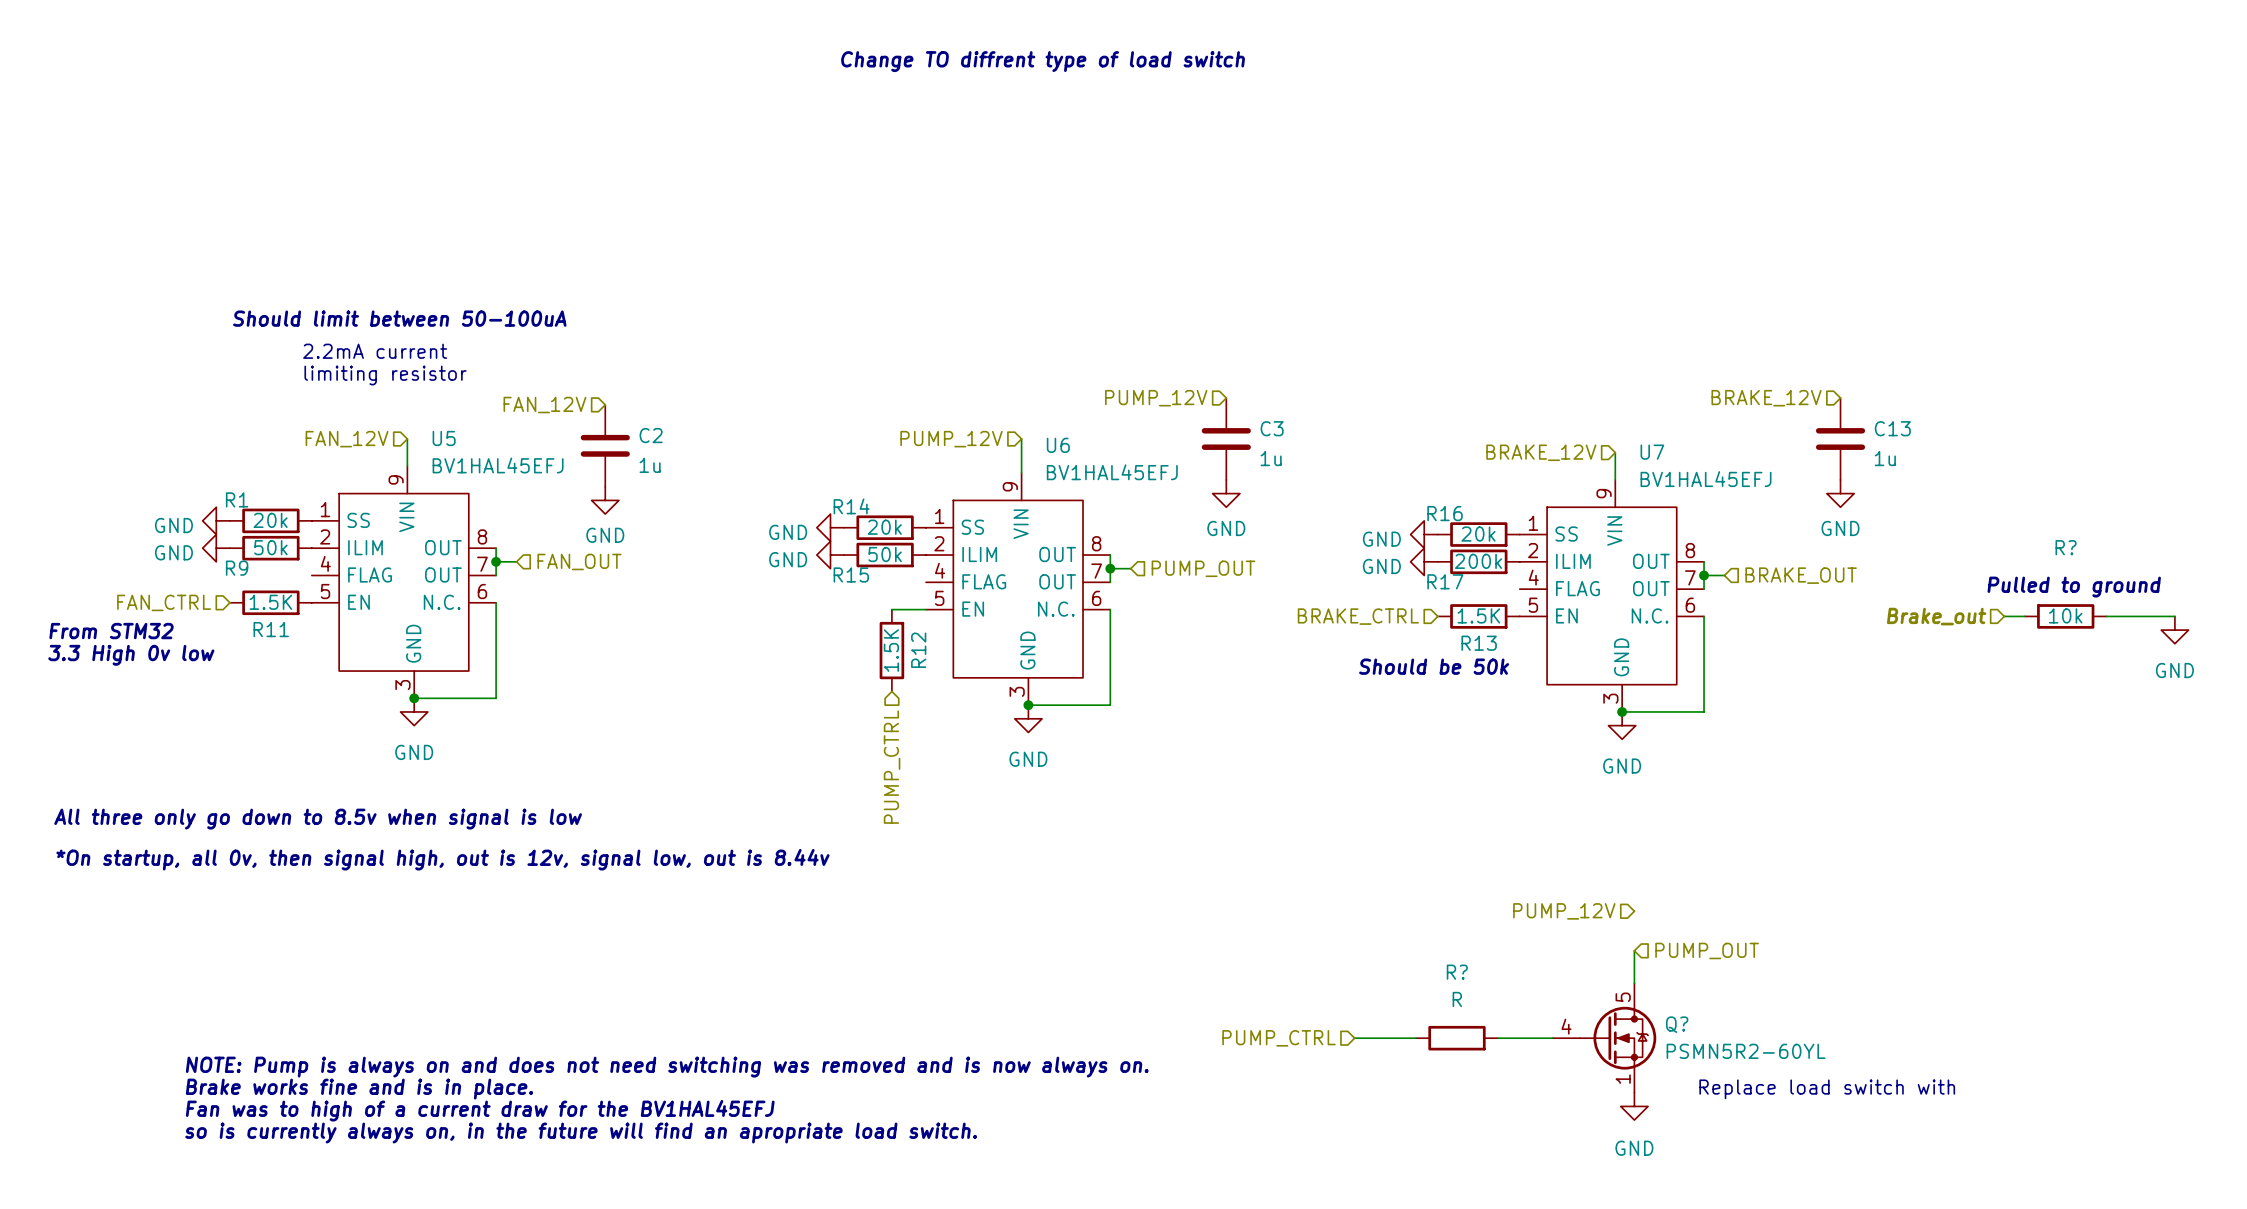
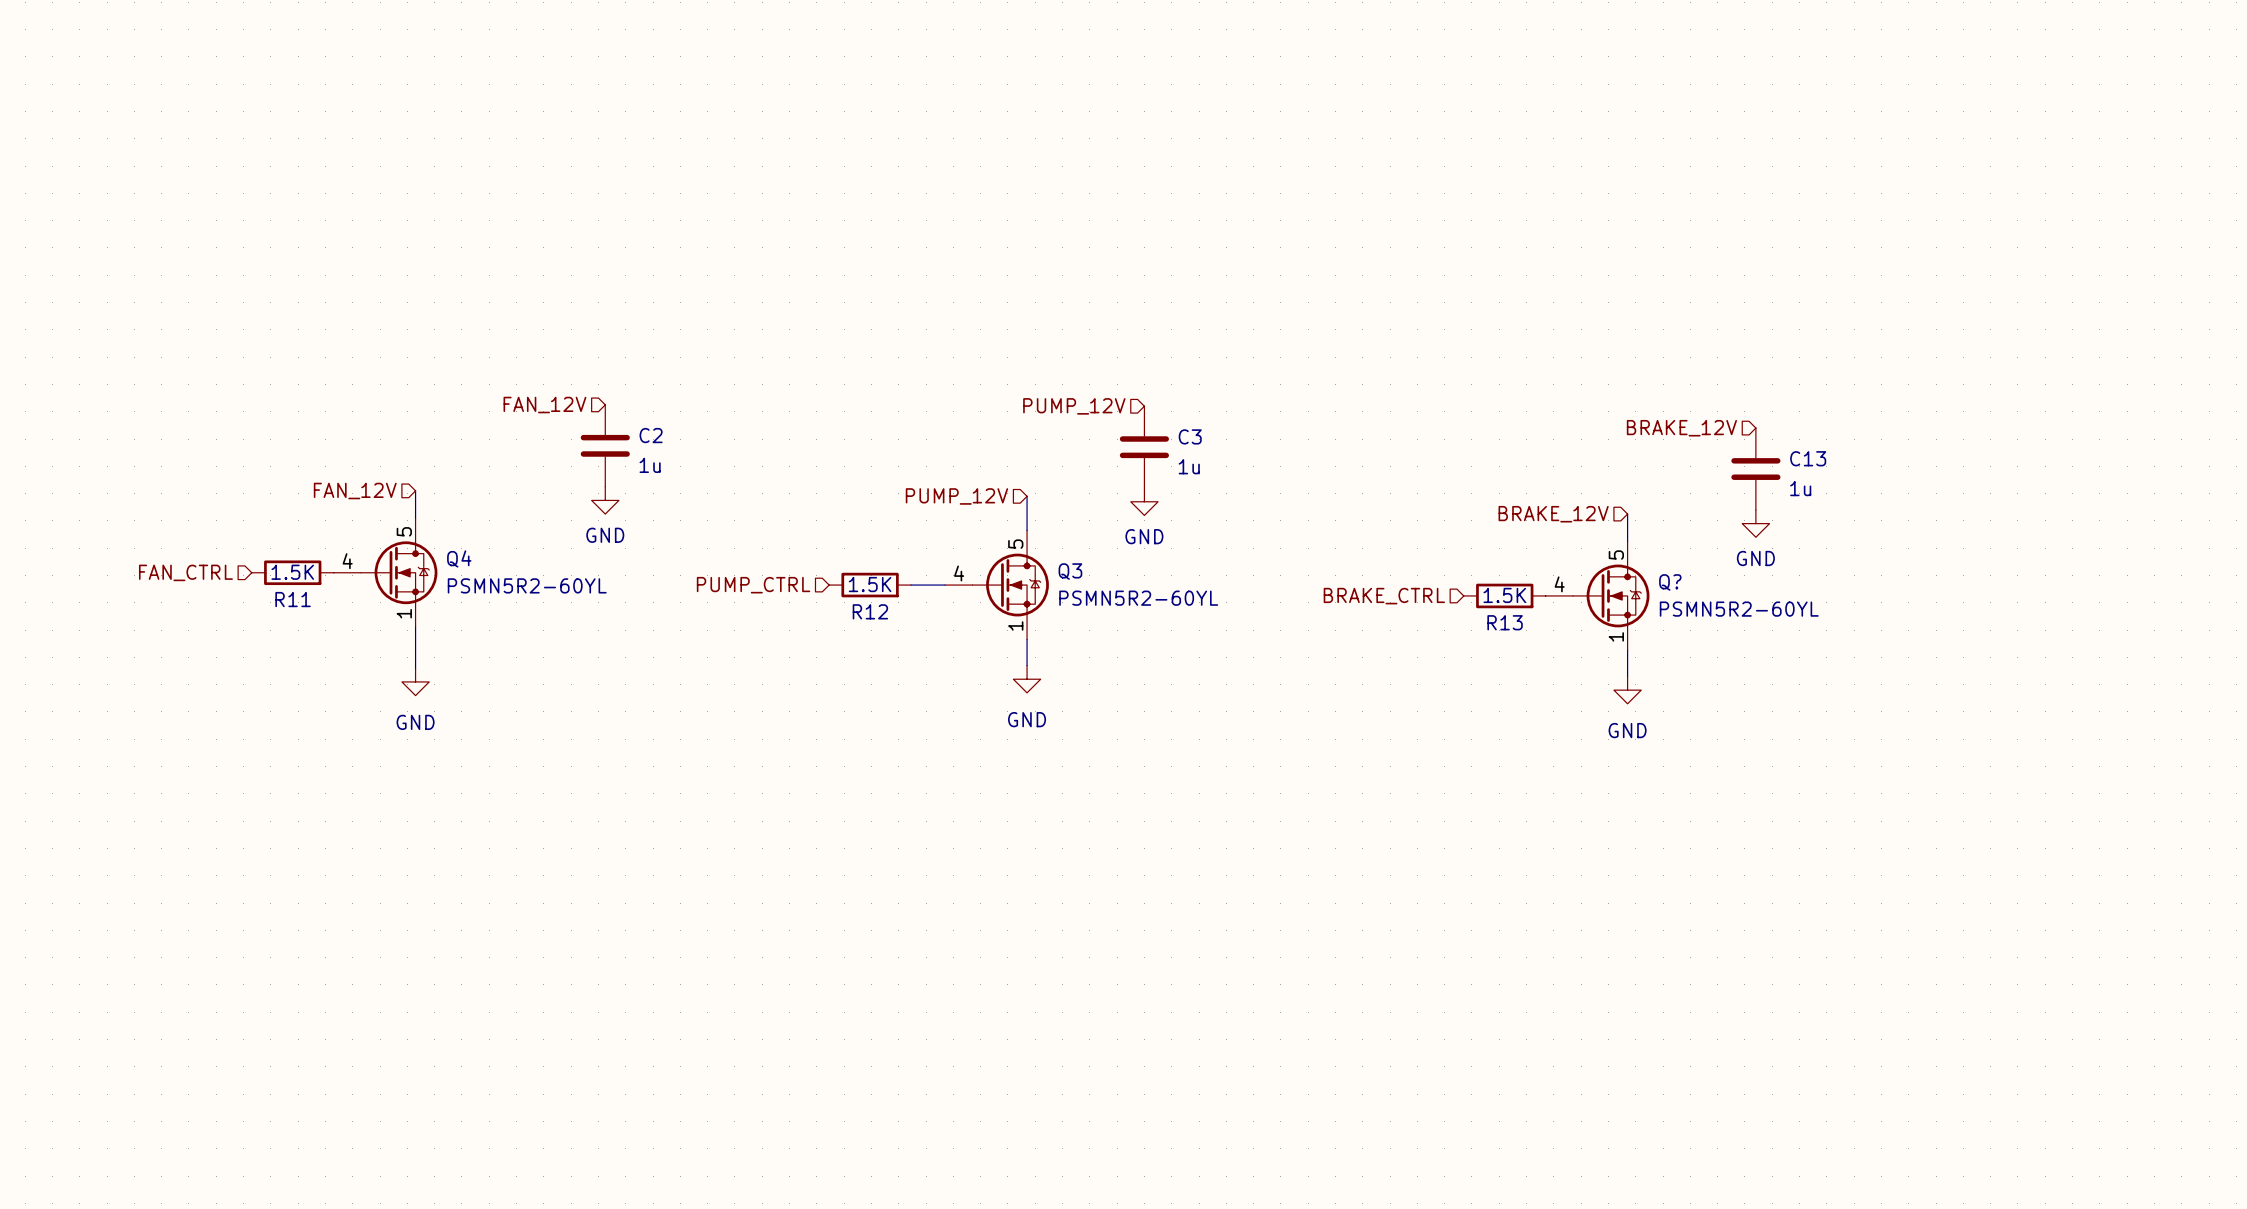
text: Change TO diffrent type of load switch (1043, 61) -> none
text: Should limit between 50-100uA (399, 318) -> none
text: 2.2mA current (375, 351) -> none
text: limiting resistor (385, 375) -> none
hierarchical label position: PUMP_12V (1156, 398) -> PUMP_12V (1074, 406)
hierarchical label: BRAKE_12V (1766, 398) -> none
hierarchical label: none -> BRAKE_12V (1681, 428)
hierarchical label position: FAN_12V (347, 439) -> FAN_12V (355, 491)
wire: (407, 439) (407, 466) -> (415, 490) (415, 518)
hierarchical label position: PUMP_12V (951, 439) -> PUMP_12V (956, 496)
wire: (1021, 439) (1021, 473) -> (1027, 496) (1027, 530)
C3 position: (1226, 439) -> (1144, 447)
C13 position: (1840, 439) -> (1755, 469)
hierarchical label position: BRAKE_12V (1541, 452) -> BRAKE_12V (1553, 514)
wire: (1615, 452) (1615, 479) -> (1627, 514) (1627, 541)
power symbol position: GND (1226, 493) -> GND (1144, 501)
power symbol position: GND (1840, 493) -> GND (1755, 523)
power symbol: GND (216, 520) -> none
R1: 20k (270, 520) -> none
power symbol: GND (830, 527) -> none
R14: 20k (885, 527) -> none
power symbol: GND (1424, 534) -> none
R16: 20k (1478, 534) -> none
power symbol: GND (216, 548) -> none
R9: 50k (270, 548) -> none
wire: (496, 548) (496, 575) -> none
power symbol: GND (830, 555) -> none
R15: 50k (885, 555) -> none
wire: (1110, 555) (1110, 582) -> none
wire: (496, 561) (516, 561) -> none
junction: (496, 561) -> none
hierarchical label: FAN_OUT (579, 561) -> none
power symbol: GND (1424, 561) -> none
R17: 200k (1478, 561) -> none
wire: (1704, 561) (1704, 589) -> none
wire: (1110, 568) (1130, 568) -> none
junction: (1110, 568) -> none
hierarchical label: PUMP_OUT (1203, 568) -> none
Q4: none -> PSMN5R2-60YL (385, 572)
wire: (1704, 575) (1724, 575) -> none
junction: (1704, 575) -> none
hierarchical label: BRAKE_OUT (1801, 575) -> none
U5: BV1HAL45EFJ (403, 582) -> none
Q3: none -> PSMN5R2-60YL (997, 585)
text: Pulled to ground (2074, 587) -> none
U6: BV1HAL45EFJ (1018, 589) -> none
Q?: none -> PSMN5R2-60YL (1597, 595)
U7: BV1HAL45EFJ (1611, 595) -> none
hierarchical label position: FAN_CTRL (164, 602) -> FAN_CTRL (185, 572)
R11 position: (270, 602) -> (292, 572)
wire: (496, 602) (496, 698) (414, 698) -> none
wire: (891, 609) (926, 609) -> (911, 585) (945, 585)
wire: (1110, 609) (1110, 705) (1028, 705) -> none
hierarchical label position: BRAKE_CTRL (1358, 616) -> BRAKE_CTRL (1384, 596)
R13 position: (1478, 616) -> (1504, 595)
wire: (1704, 616) (1704, 711) (1622, 711) -> none
hierarchical label: Brake_out (1936, 616) -> none
wire: (2004, 616) (2024, 616) -> none
R?: 10k (2065, 616) -> none
wire: (2106, 616) (2174, 616) -> none
wire: none -> (415, 627) (415, 668)
power symbol: GND (2174, 630) -> none
text: From STM32 (111, 631) -> none
wire: none -> (1027, 639) (1027, 665)
R12 rotation: 0° (891, 650) -> 90° clockwise (870, 585)
R12 position: (891, 650) -> (870, 585)
wire: none -> (1627, 650) (1627, 676)
text: 3.3 High 0v low (131, 655) -> none
text: Should be 50k (1434, 666) -> none
junction: (414, 698) -> none
junction: (1028, 705) -> none
power symbol position: GND (414, 711) -> GND (415, 681)
junction: (1622, 711) -> none
power symbol position: GND (1028, 718) -> GND (1027, 679)
power symbol position: GND (1622, 725) -> GND (1627, 690)
hierarchical label rotation: 0° (892, 767) -> 90° clockwise (753, 585)
hierarchical label position: PUMP_CTRL (892, 767) -> PUMP_CTRL (753, 585)
text: All three only go down to 8.5v when signal is low (318, 819) -> none
text: *On startup, all 0v, then signal high, out is 12v, signal low, out is 8.44v (442, 859) -> none
hierarchical label: PUMP_12V (1564, 911) -> none
wire: (1634, 950) (1634, 983) -> none
hierarchical label: PUMP_OUT (1707, 950) -> none
hierarchical label: PUMP_CTRL (1279, 1038) -> none
wire: (1354, 1038) (1416, 1038) -> none
R?: R (1456, 1038) -> none
wire: (1497, 1038) (1552, 1038) -> none
Q?: PSMN5R2-60YL (1604, 1038) -> none
text: NOTE: Pump is always on and does not need switching was removed and is now always on. (667, 1067) -> none
text: Brake works fine and is in place. (359, 1089) -> none
text: Replace load switch with (1827, 1089) -> none
power symbol: GND (1634, 1106) -> none
text: Fan was to high of a current draw for the BV1HAL45EFJ (480, 1110) -> none
text: so is currently always on, in the future will find an apropriate load switch. (581, 1133) -> none

